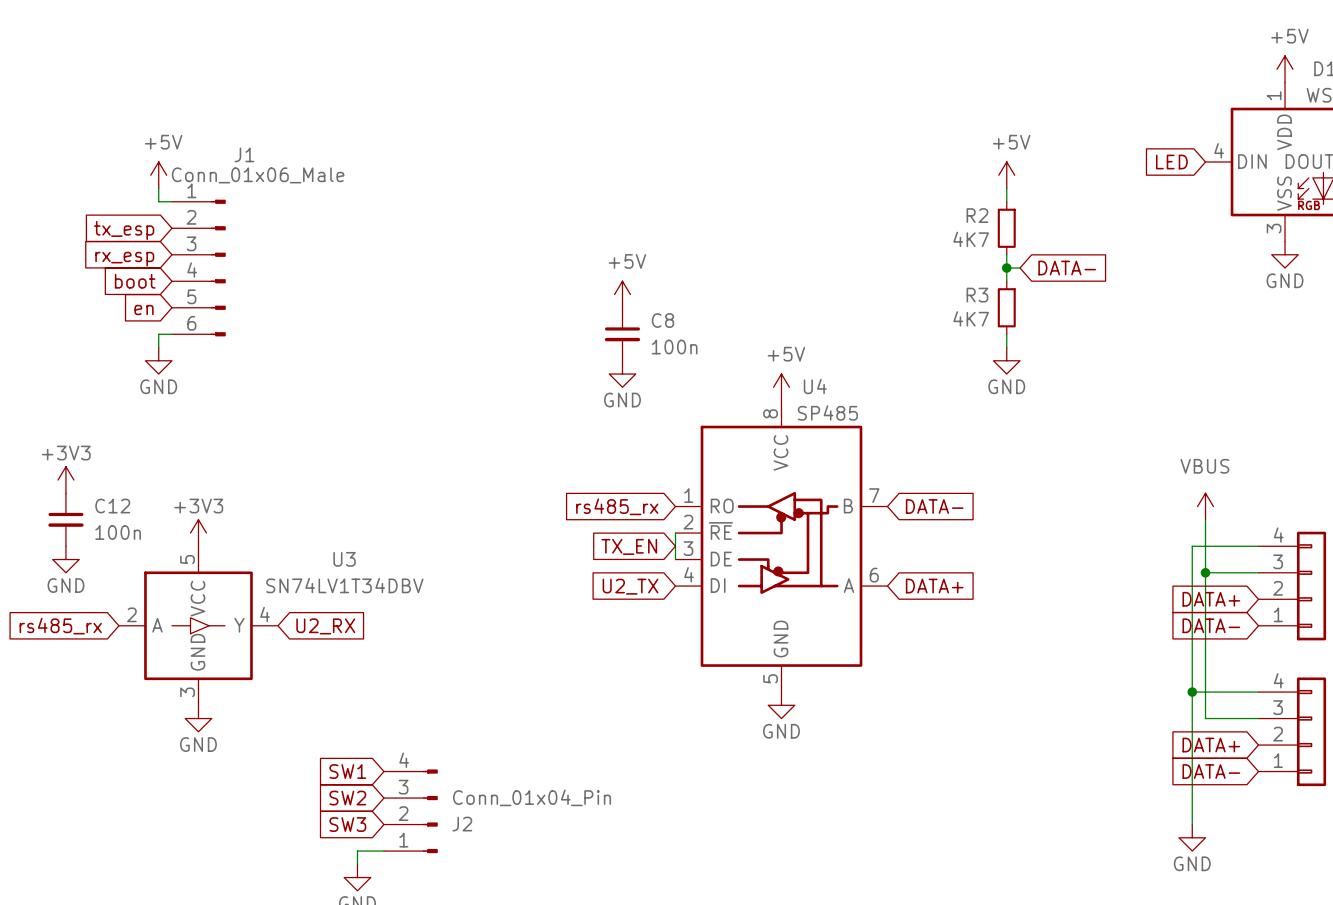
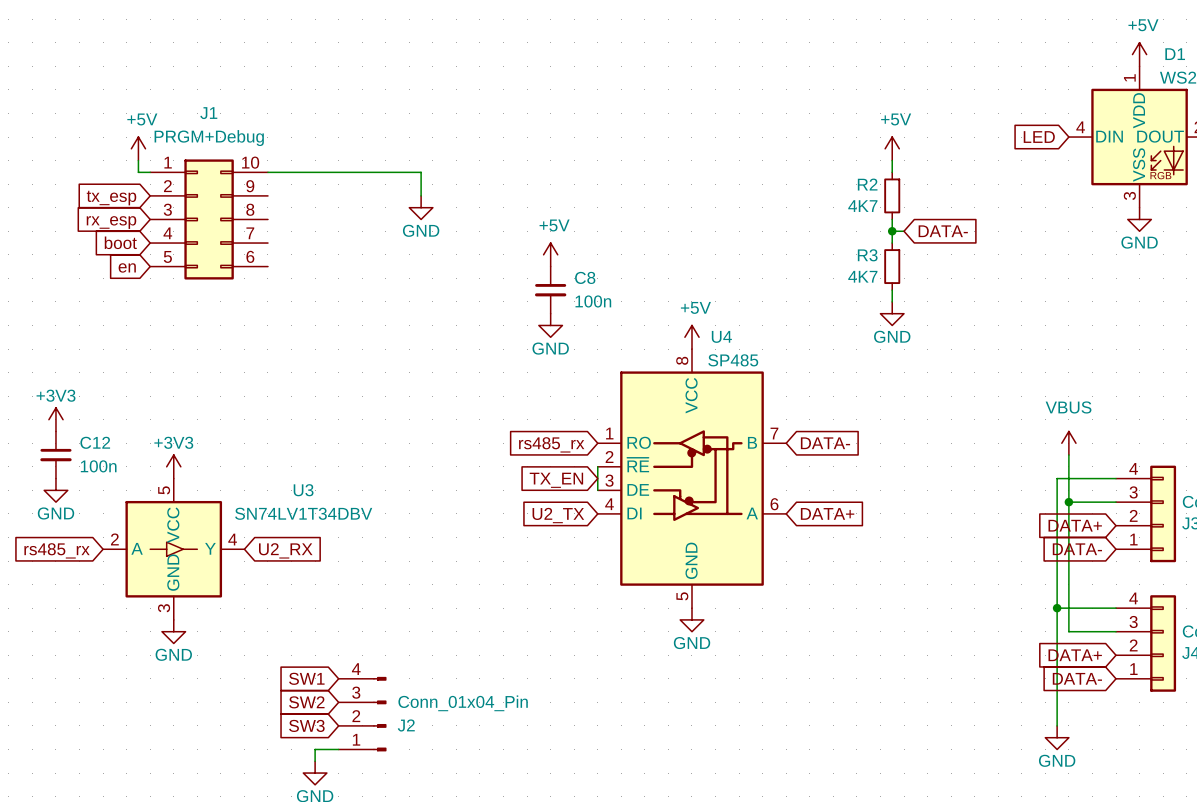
J1 name position: J1 (244, 154) -> J1 (208, 113)
J1 value: Conn_01x06_Male (258, 175) -> PRGM+Debug (209, 138)
J1 symbol: [171, 199, 226, 337] -> [150, 159, 268, 280]
wire: none -> (267, 172) (421, 172) (421, 195)
power symbol: none -> GND (421, 207)
wire: (171, 334) (158, 334) (158, 347) -> none
power symbol: GND (158, 360) -> none

